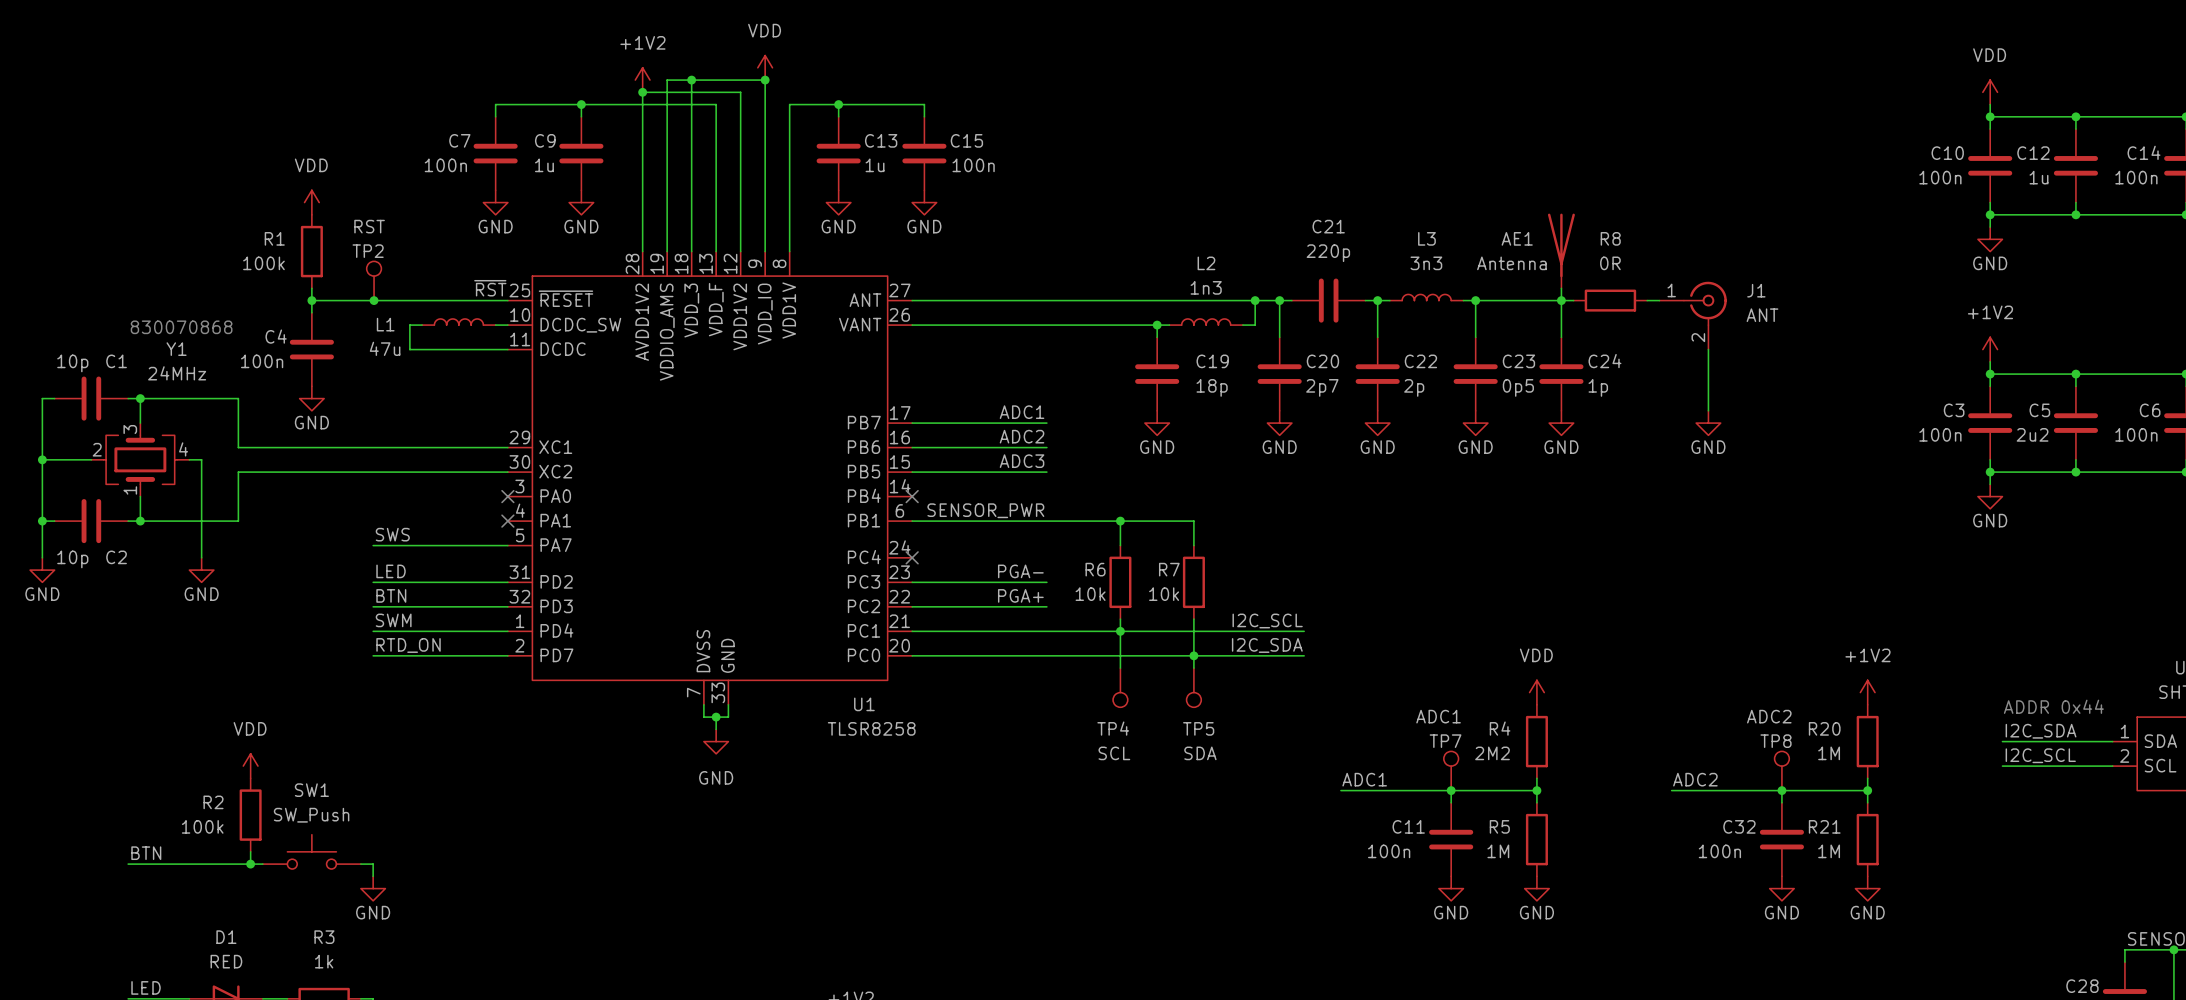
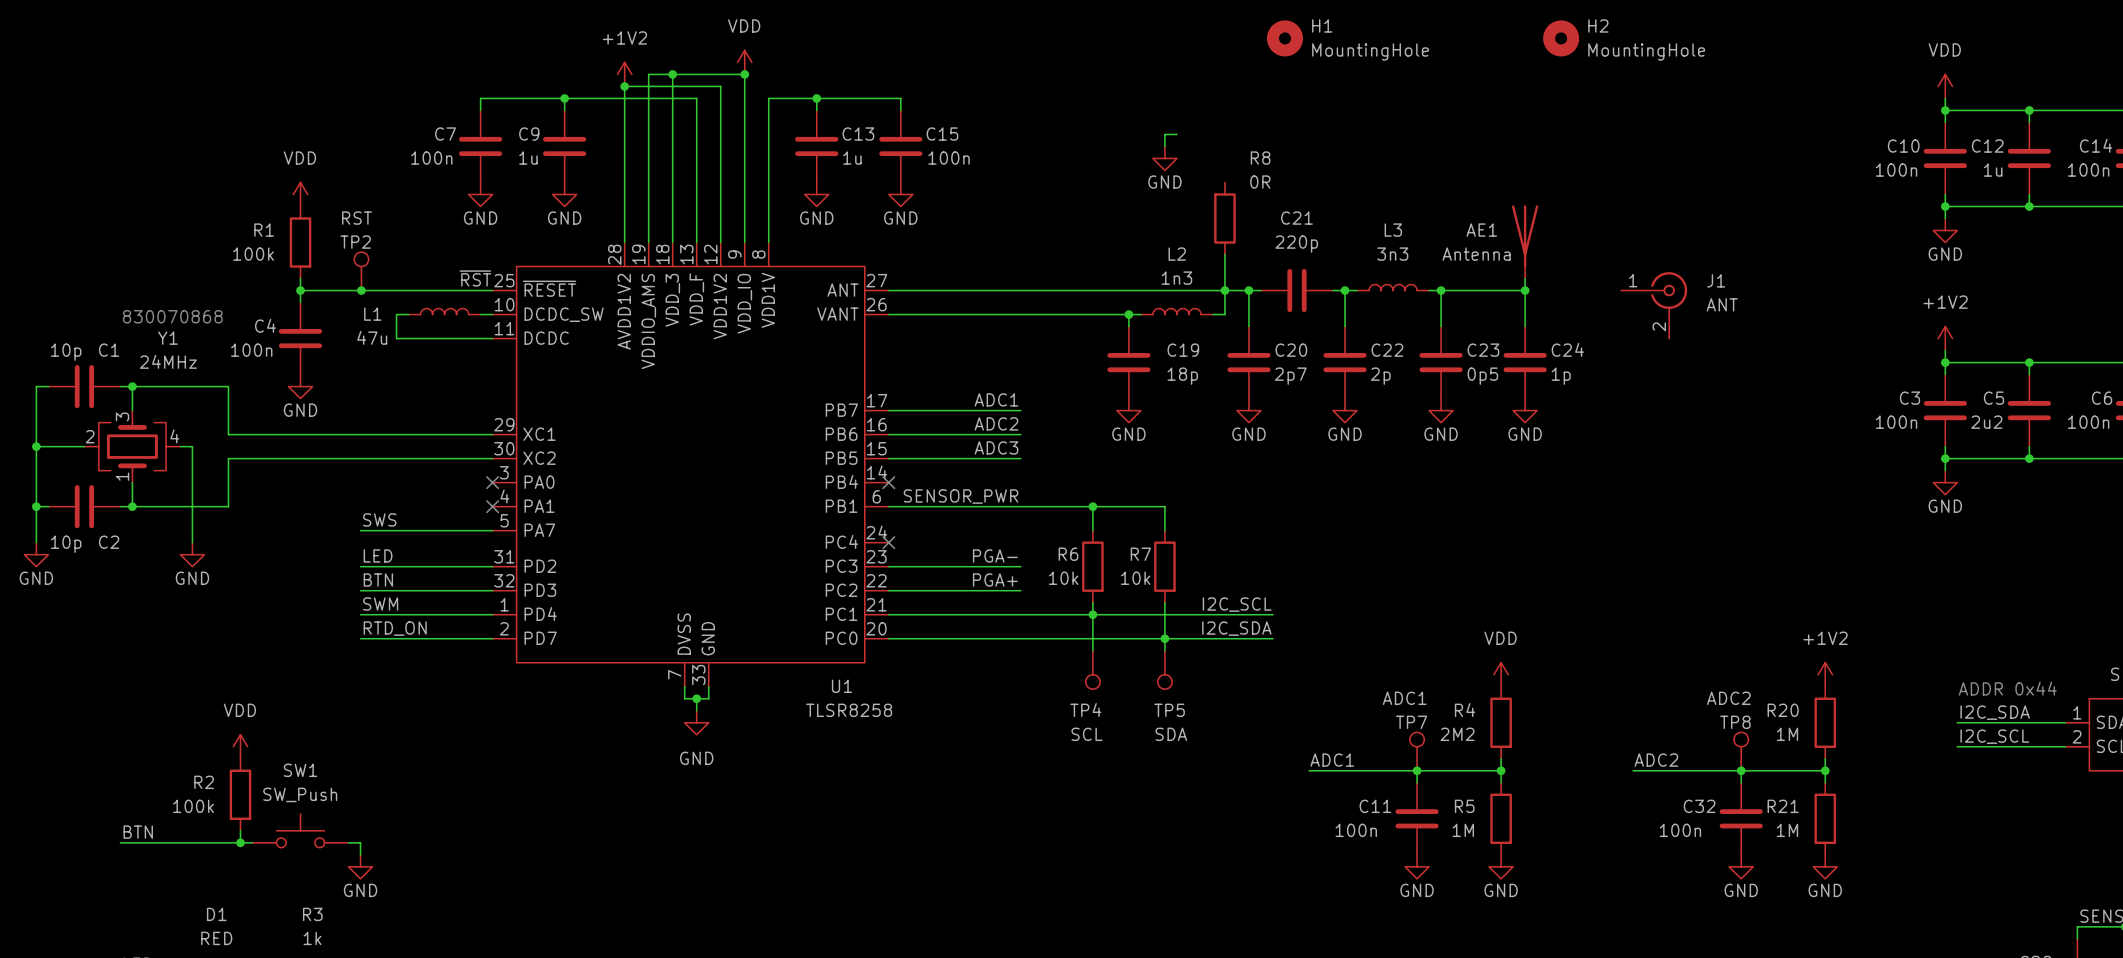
H1: none -> MountingHole (1284, 38)
H2: none -> MountingHole (1561, 38)
wire: none -> (1176, 134) (1164, 134) (1164, 146)
power symbol: none -> GND (1164, 158)
R8 name position: R8 (1610, 238) -> R8 (1260, 158)
wire: none -> (1224, 254) (1224, 290)
R8 value position: 0R (1610, 263) -> 0R (1260, 182)
wire: (1561, 300) (1573, 300) -> none
R8 rotation: 0° (1610, 300) -> 90° clockwise (1224, 218)
R8 position: (1610, 300) -> (1224, 218)
wire: (1647, 300) (1659, 300) -> none
wire: (1708, 349) (1708, 410) -> none
power symbol: GND (1708, 423) -> none

